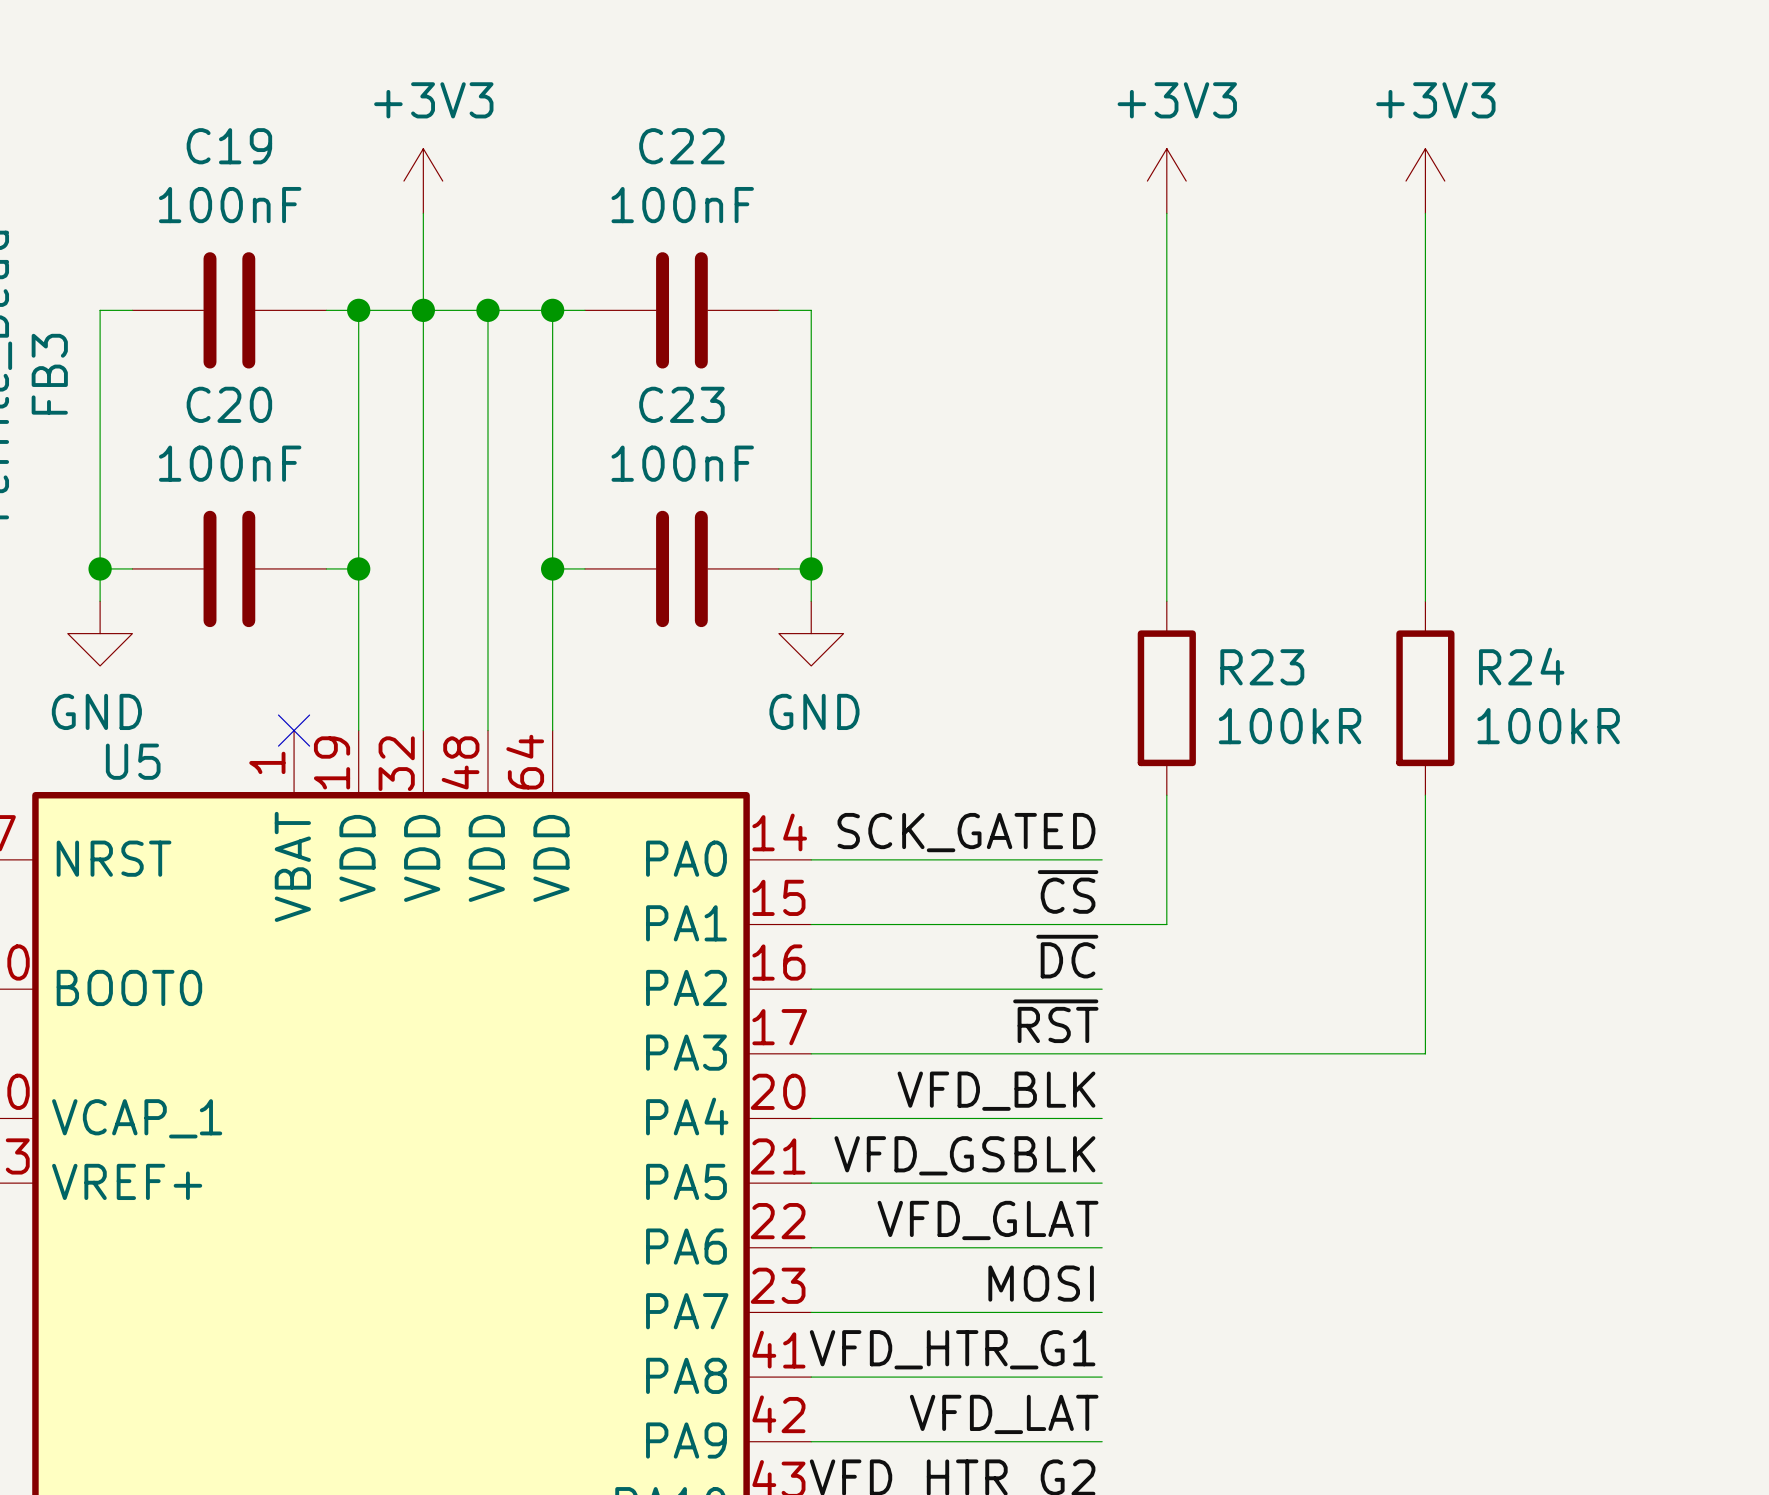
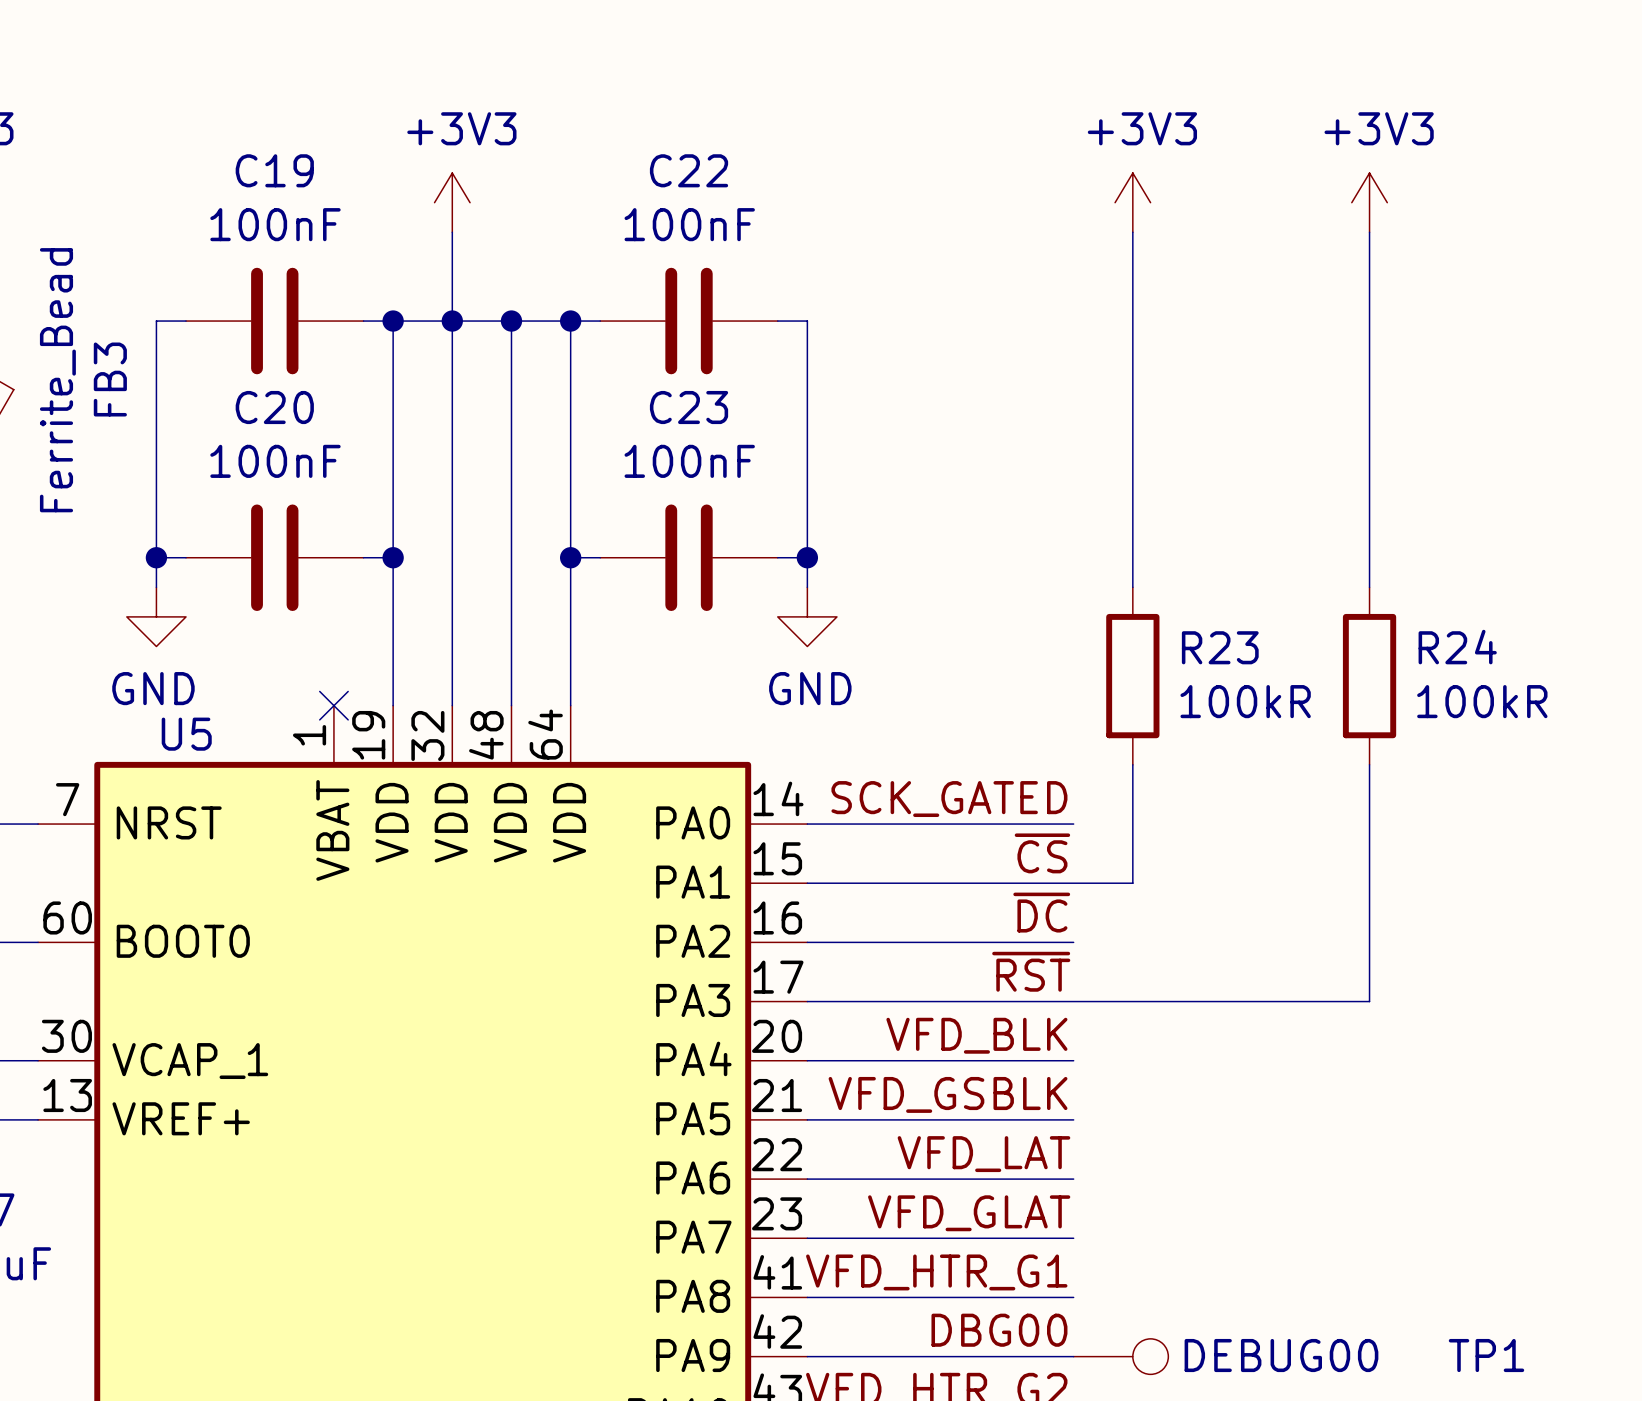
label: VFD_GLAT (988, 1220) -> VFD_LAT (983, 1154)
label: MOSI (1041, 1283) -> VFD_GLAT (969, 1213)
label: VFD_LAT (1004, 1414) -> DBG00 (999, 1330)
TP1: none -> DEBUG00 (1121, 1356)

